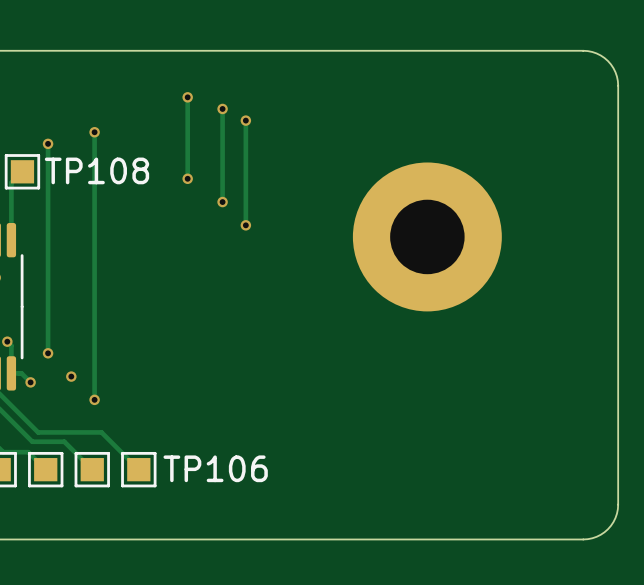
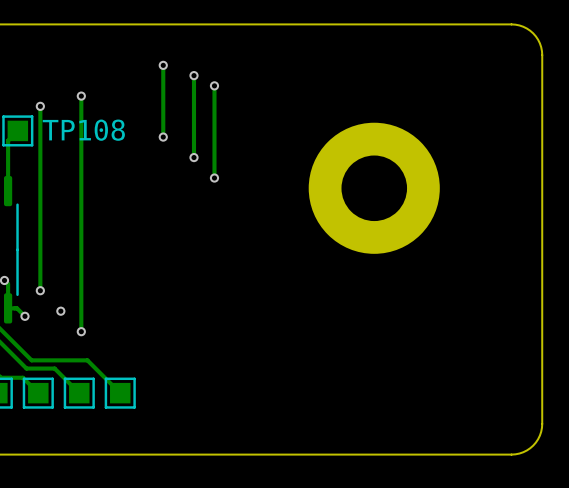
TP106 name: TP106 (215, 468) -> none

